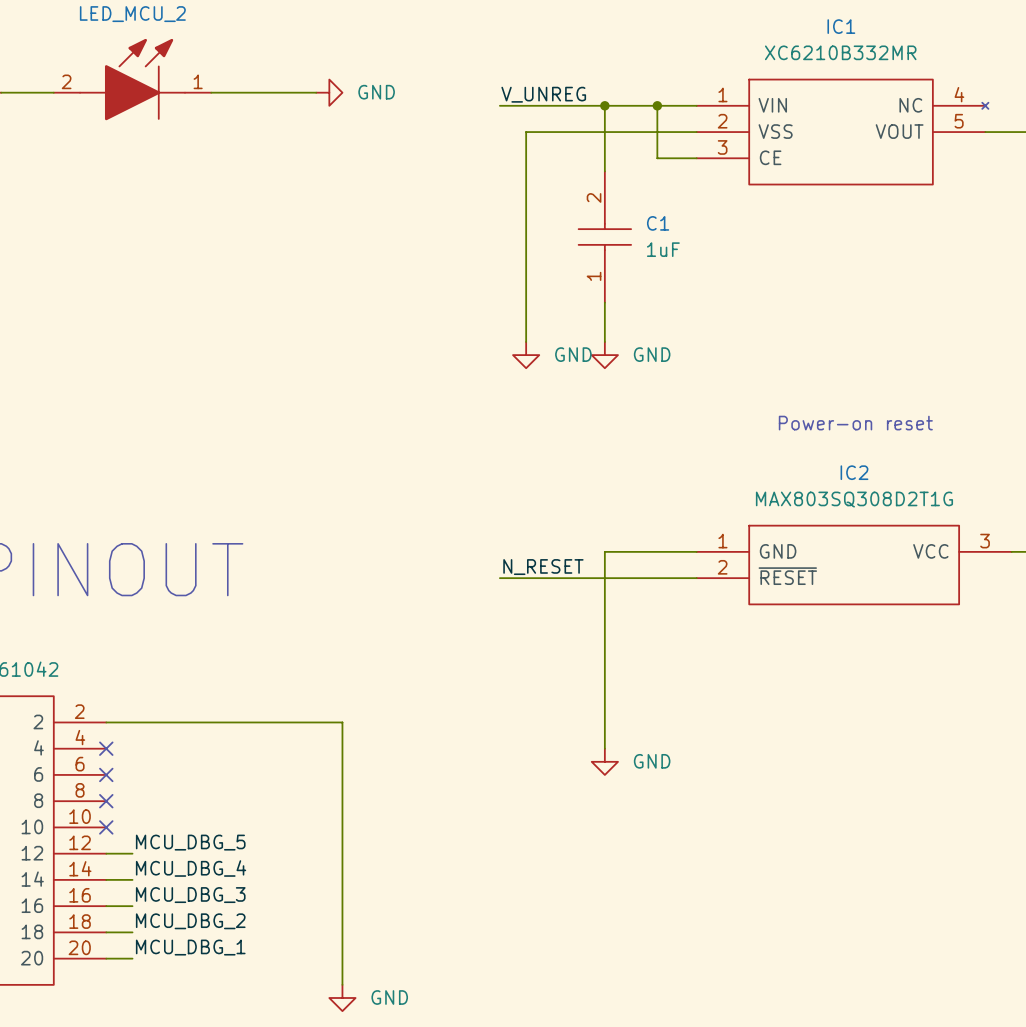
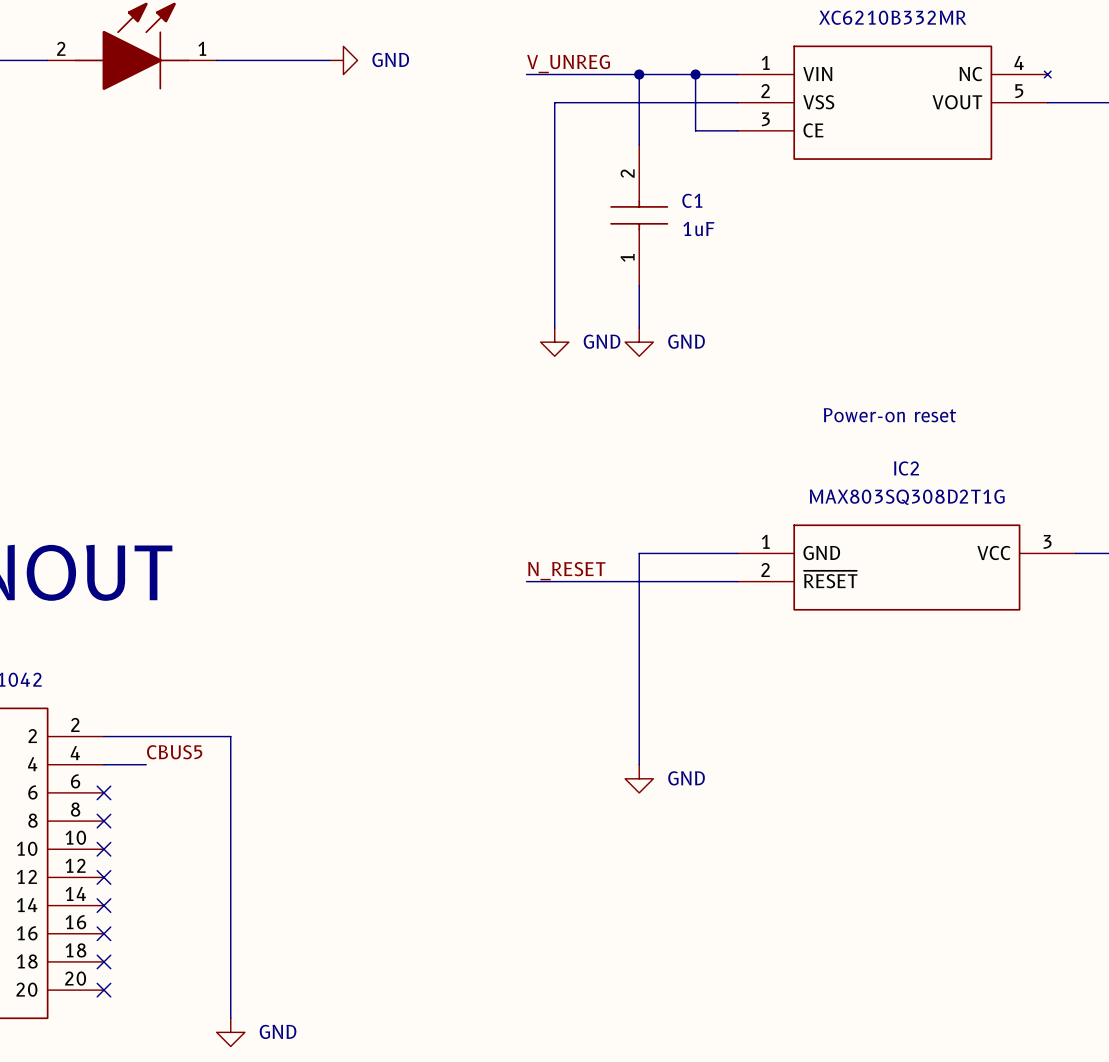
wire: (224, 722) (342, 722) (342, 984) -> (230, 736) (230, 1018)
label: none -> CBUS5 (174, 752)
wire: none -> (103, 764) (146, 764)
no-connect mark: (106, 748) -> none
label: MCU_DBG_5 (190, 842) -> none
wire: (106, 853) (132, 853) -> none
no-connect mark: none -> (103, 877)
label: MCU_DBG_4 (191, 868) -> none
wire: (106, 879) (132, 879) -> none
no-connect mark: none -> (103, 905)
label: MCU_DBG_3 (190, 895) -> none
wire: (106, 906) (132, 906) -> none
no-connect mark: none -> (103, 933)
label: MCU_DBG_2 (190, 921) -> none
wire: (106, 932) (132, 932) -> none
no-connect mark: none -> (103, 961)
label: MCU_DBG_1 (190, 947) -> none
wire: (106, 958) (132, 958) -> none
no-connect mark: none -> (103, 990)
power symbol position: GND (342, 998) -> GND (230, 1032)

